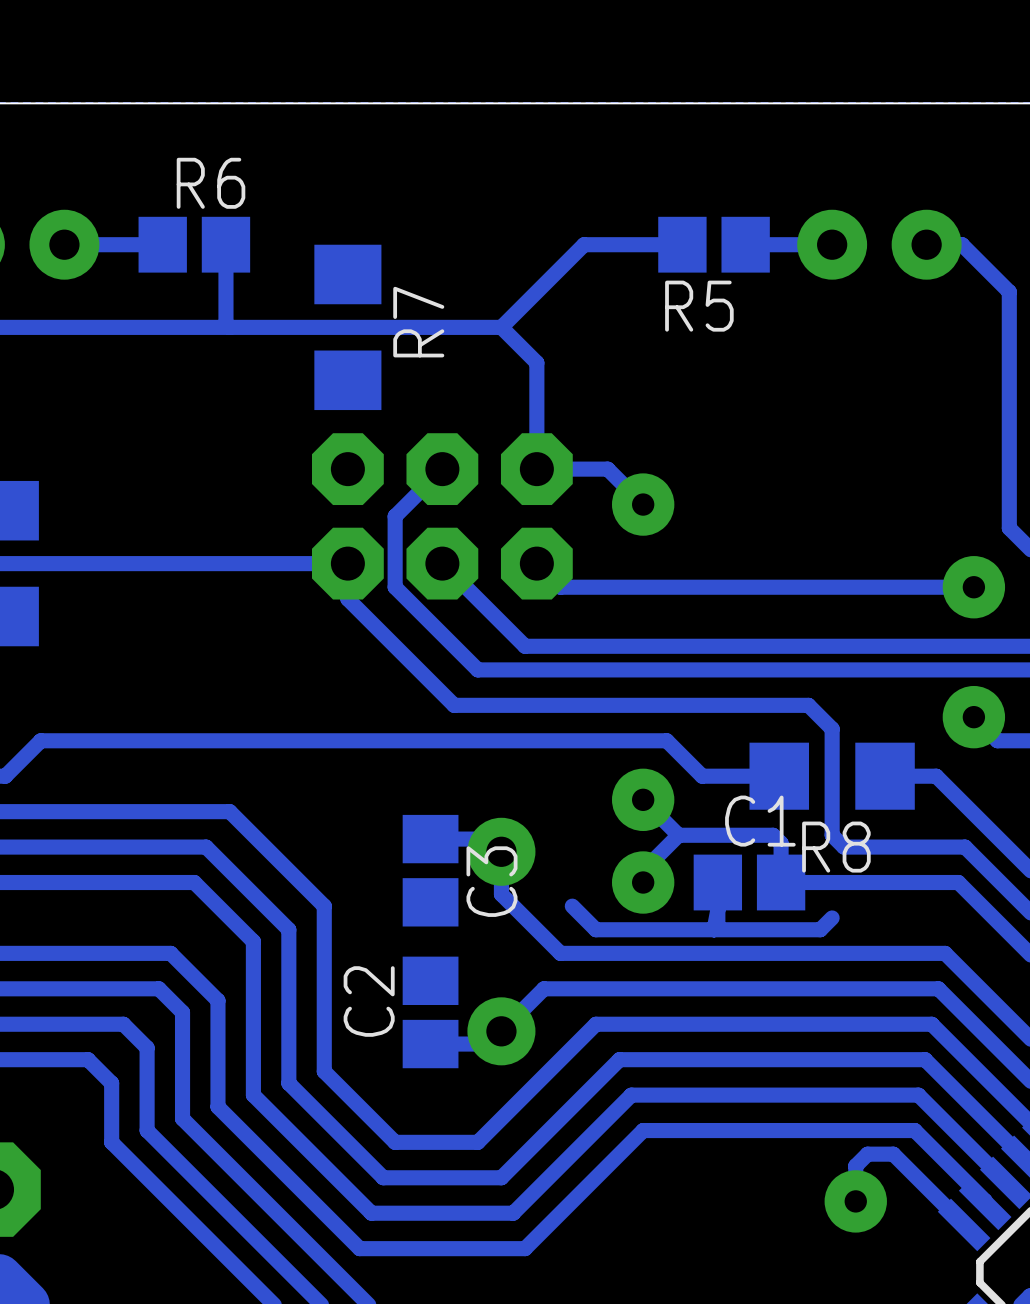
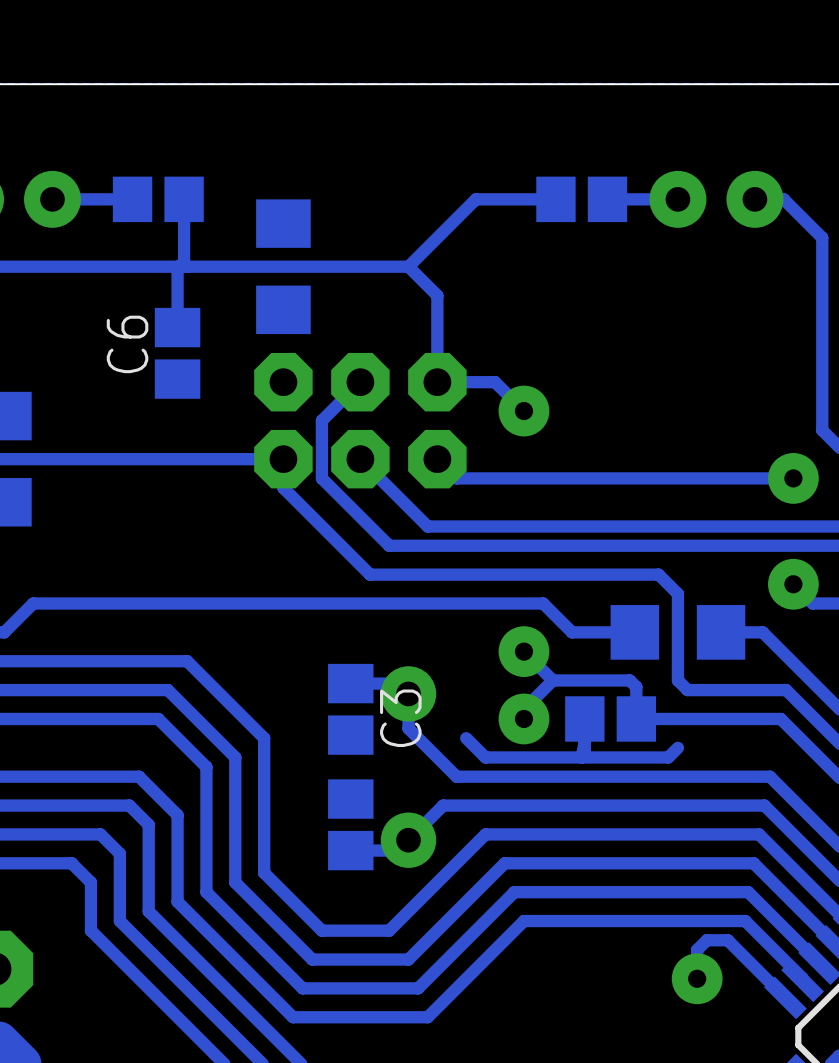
R6 name: R6 (211, 183) -> none
R5 name: R5 (699, 306) -> none
R7 name: R7 (418, 322) -> none
track: none -> (177, 266) (177, 327)
C6: none -> (177, 353)
C1 name: C1 (760, 821) -> none
R8 name: R8 (836, 847) -> none
C2 name: C2 (369, 1001) -> none

